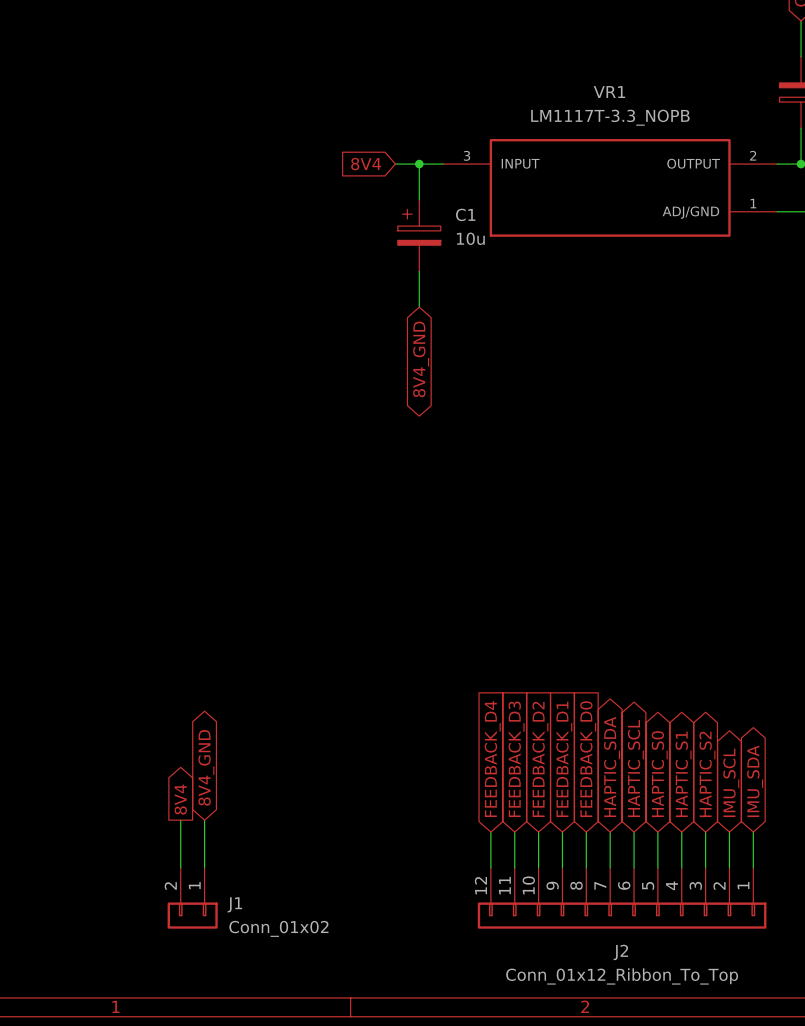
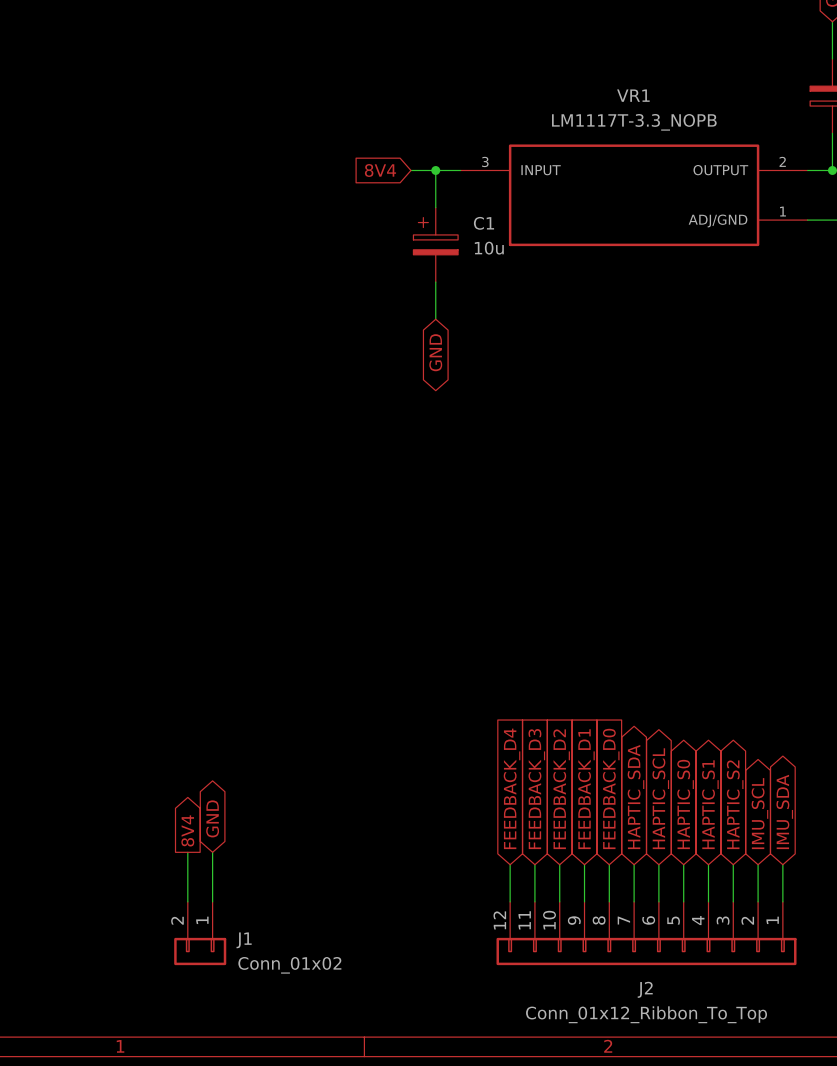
global label: 8V4_GND (421, 359) -> GND (435, 352)
global label: 8V4_GND (206, 767) -> GND (212, 818)

